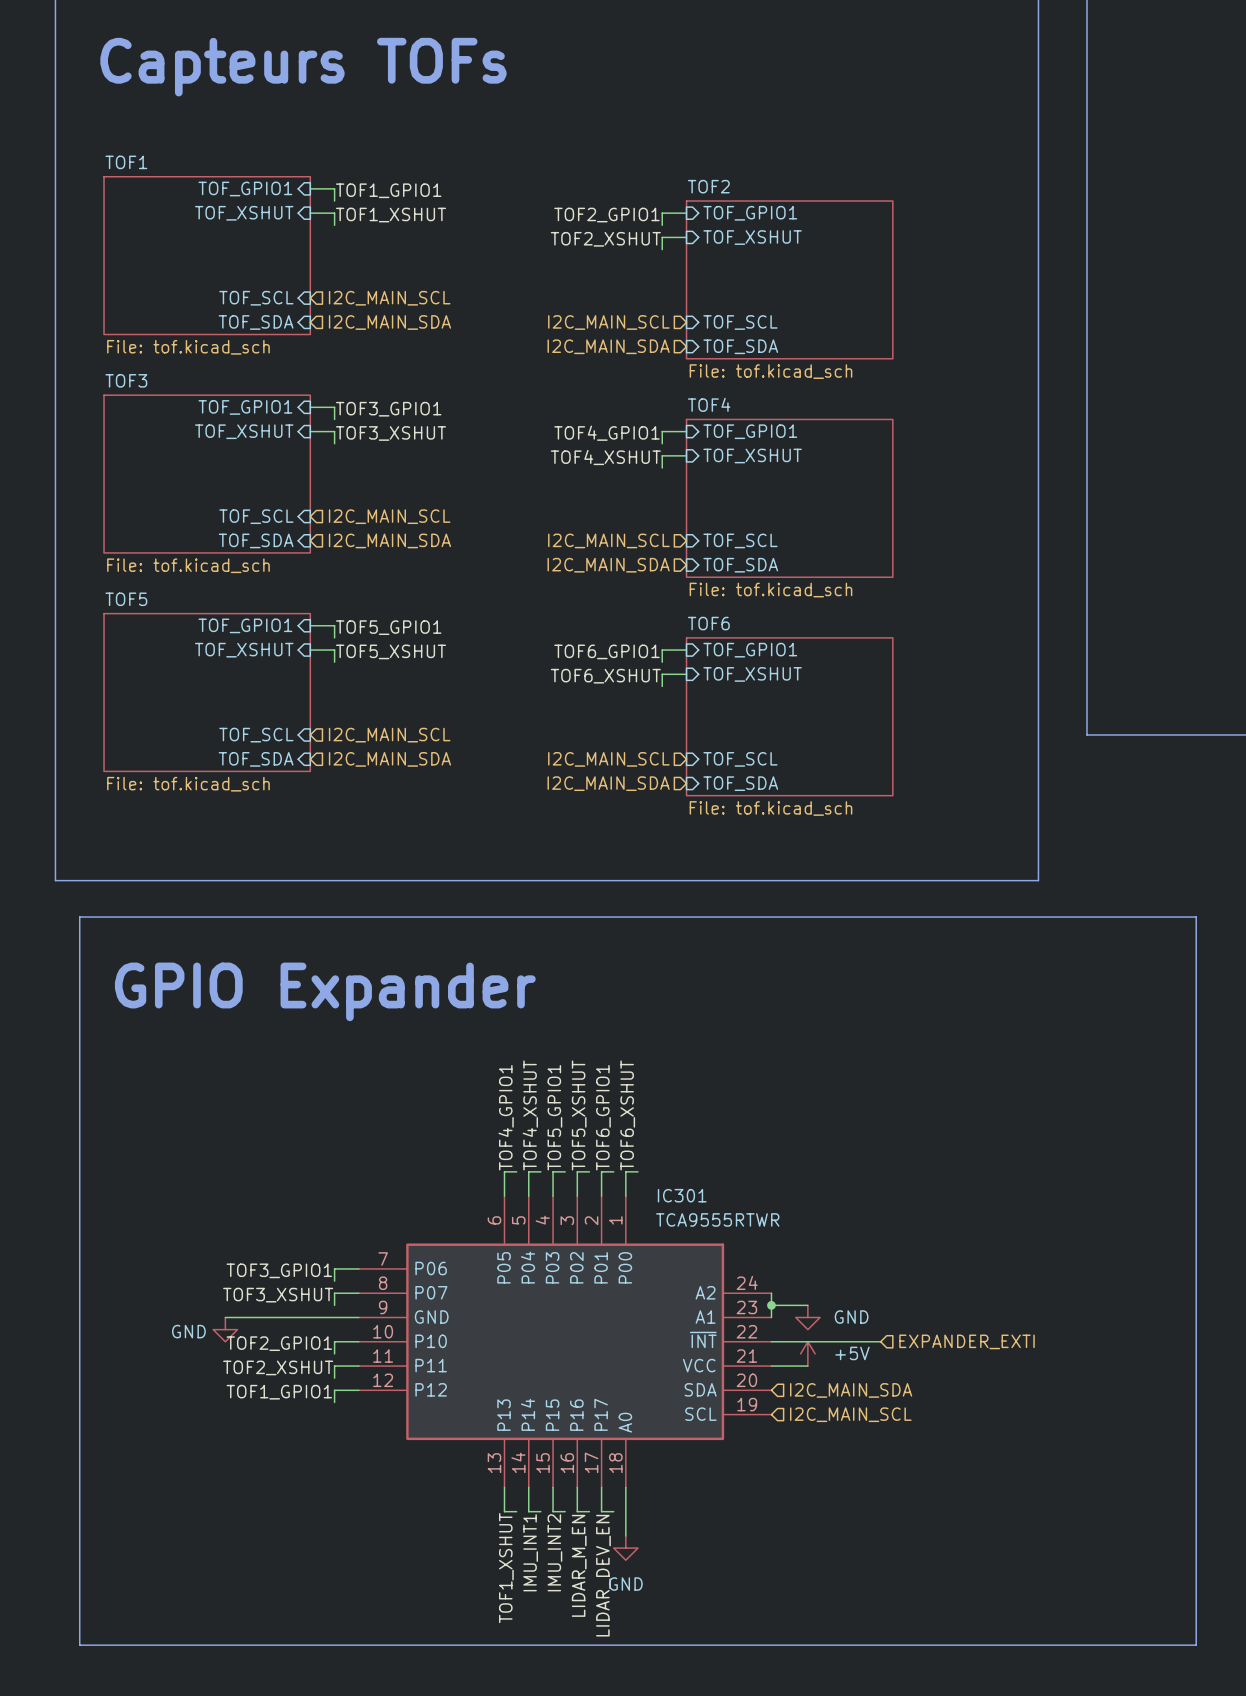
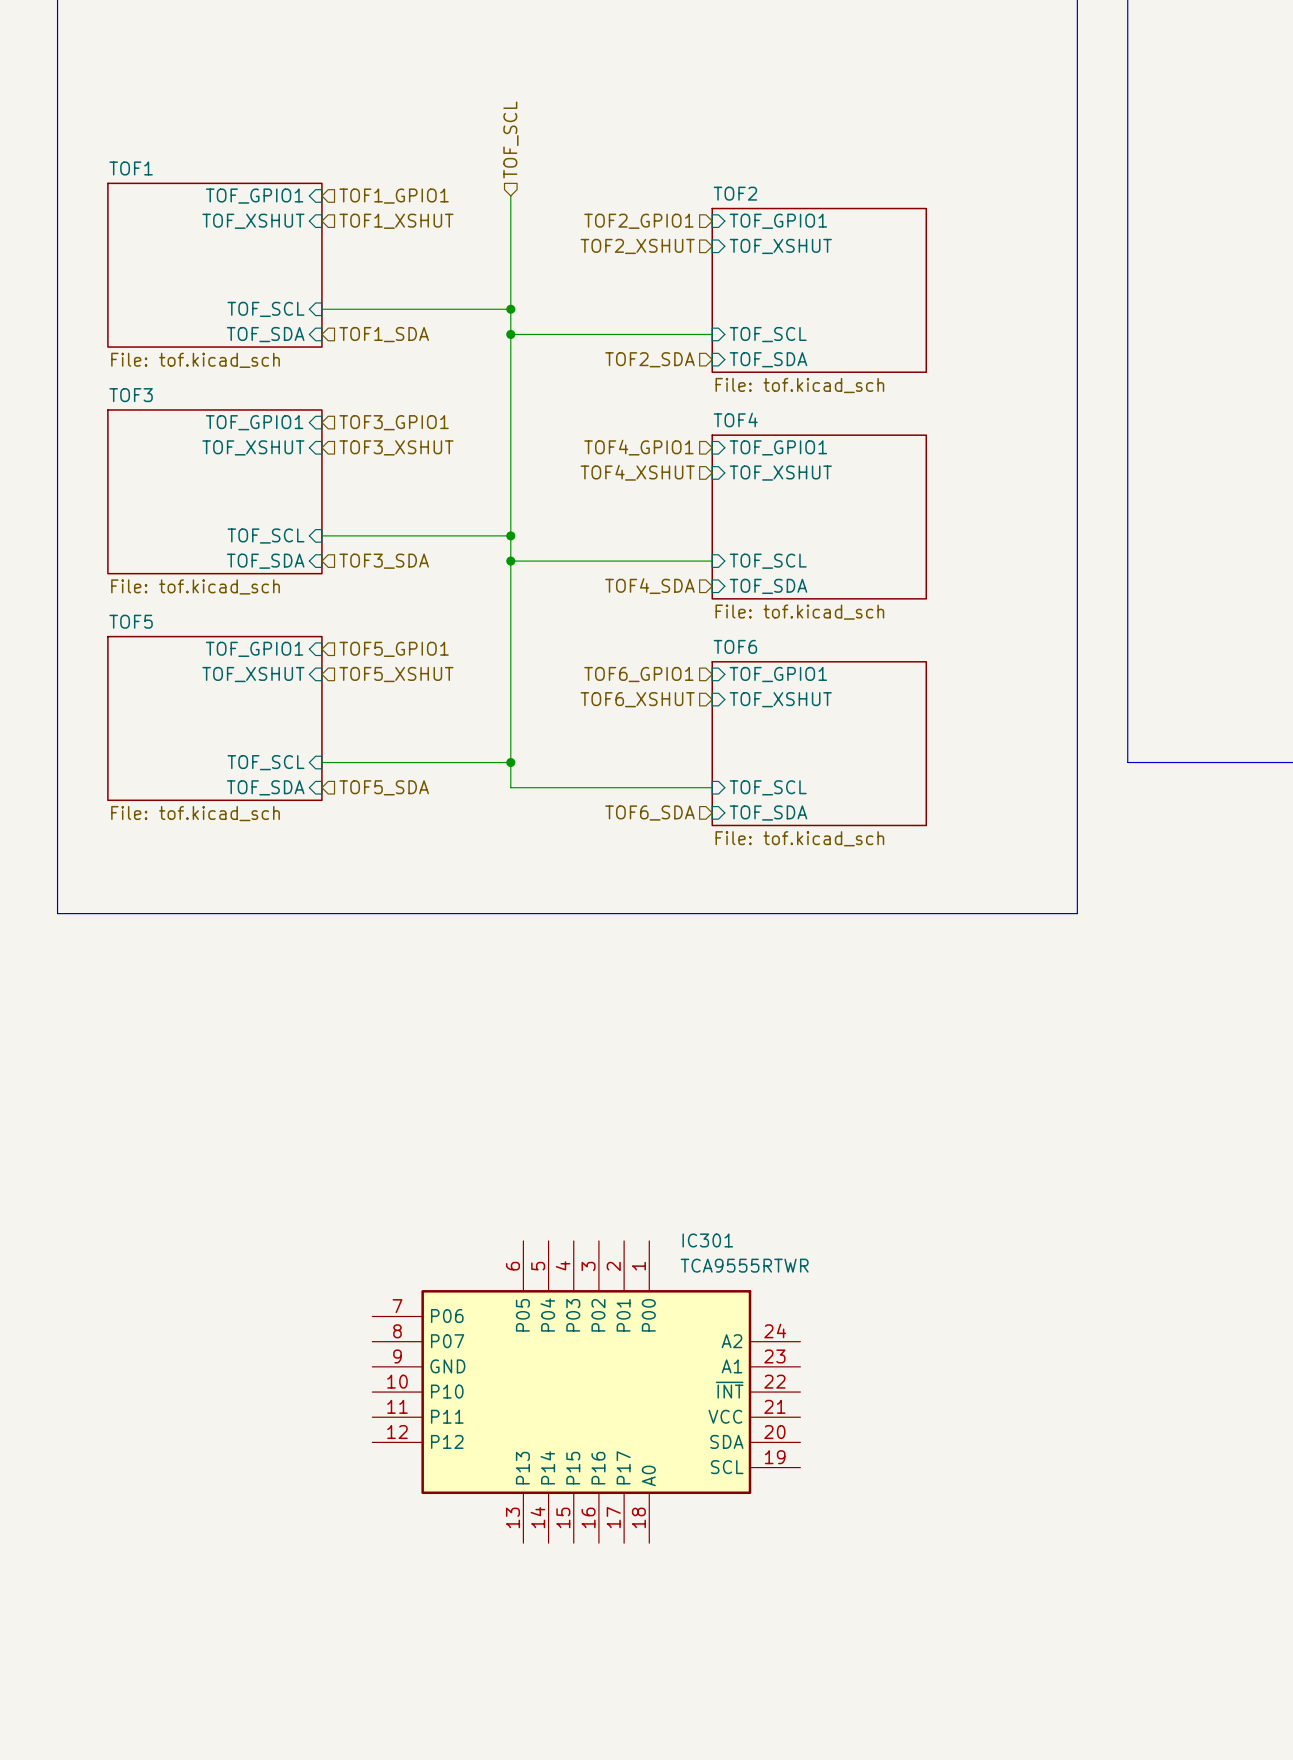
text: Capteurs TOFs (303, 67) -> none
hierarchical label: none -> TOF_SCL (510, 140)
wire: (310, 188) (334, 188) (334, 201) -> none
wire: none -> (510, 195) (510, 787) (712, 787)
hierarchical label: none -> TOF1_GPIO1 (394, 196)
label: TOF1_GPIO1 (388, 190) -> none
wire: (310, 213) (334, 213) (334, 225) -> none
hierarchical label: none -> TOF1_XSHUT (396, 221)
hierarchical label: none -> TOF2_GPIO1 (638, 221)
wire: (686, 213) (662, 213) (662, 225) -> none
label: TOF1_XSHUT (391, 215) -> none
label: TOF2_GPIO1 (606, 215) -> none
hierarchical label: none -> TOF2_XSHUT (637, 246)
wire: (686, 237) (662, 237) (662, 249) -> none
label: TOF2_XSHUT (605, 239) -> none
wire: none -> (321, 309) (510, 309)
hierarchical label: I2C_MAIN_SCL (389, 298) -> none
junction: none -> (510, 309)
hierarchical label: I2C_MAIN_SDA (389, 322) -> TOF1_SDA (384, 334)
wire: none -> (510, 334) (712, 334)
junction: none -> (510, 334)
hierarchical label: I2C_MAIN_SCL (608, 322) -> none
hierarchical label: I2C_MAIN_SDA (608, 346) -> TOF2_SDA (649, 359)
wire: (310, 407) (334, 407) (334, 419) -> none
hierarchical label: none -> TOF3_GPIO1 (394, 422)
label: TOF3_GPIO1 (388, 409) -> none
wire: (310, 431) (334, 431) (334, 443) -> none
hierarchical label: none -> TOF3_XSHUT (396, 447)
hierarchical label: none -> TOF4_GPIO1 (638, 447)
wire: (686, 431) (662, 431) (662, 443) -> none
label: TOF3_XSHUT (391, 433) -> none
label: TOF4_GPIO1 (606, 433) -> none
hierarchical label: none -> TOF4_XSHUT (637, 472)
wire: (686, 455) (662, 455) (662, 468) -> none
label: TOF4_XSHUT (605, 457) -> none
wire: none -> (321, 535) (510, 535)
hierarchical label: I2C_MAIN_SCL (389, 516) -> none
junction: none -> (510, 535)
hierarchical label: I2C_MAIN_SDA (389, 540) -> TOF3_SDA (384, 561)
wire: none -> (510, 561) (712, 561)
junction: none -> (510, 561)
hierarchical label: I2C_MAIN_SCL (608, 540) -> none
hierarchical label: I2C_MAIN_SDA (608, 565) -> TOF4_SDA (649, 586)
wire: (310, 625) (334, 625) (334, 637) -> none
hierarchical label: none -> TOF5_GPIO1 (394, 649)
label: TOF5_GPIO1 (388, 627) -> none
wire: (310, 650) (334, 650) (334, 662) -> none
hierarchical label: none -> TOF5_XSHUT (396, 674)
hierarchical label: none -> TOF6_GPIO1 (638, 674)
wire: (686, 650) (662, 650) (662, 662) -> none
label: TOF5_XSHUT (391, 651) -> none
label: TOF6_GPIO1 (606, 651) -> none
hierarchical label: none -> TOF6_XSHUT (637, 699)
wire: (686, 674) (662, 674) (662, 686) -> none
label: TOF6_XSHUT (605, 676) -> none
wire: none -> (321, 762) (510, 762)
junction: none -> (510, 762)
hierarchical label: I2C_MAIN_SCL (389, 735) -> none
hierarchical label: I2C_MAIN_SDA (389, 759) -> TOF5_SDA (384, 787)
hierarchical label: I2C_MAIN_SCL (608, 759) -> none
hierarchical label: I2C_MAIN_SDA (608, 783) -> TOF6_SDA (649, 813)
line: (79, 917) (1196, 917) (1196, 1645) (79, 1645) (79, 917) -> none
text: GPIO Expander (325, 991) -> none
label: TOF4_XSHUT (530, 1115) -> none
label: TOF5_XSHUT (579, 1115) -> none
label: TOF6_XSHUT (627, 1115) -> none
label: TOF4_GPIO1 (506, 1117) -> none
label: TOF5_GPIO1 (554, 1117) -> none
label: TOF6_GPIO1 (603, 1117) -> none
wire: (516, 1171) (504, 1171) (504, 1196) -> none
wire: (540, 1171) (528, 1171) (528, 1196) -> none
wire: (565, 1171) (553, 1171) (553, 1196) -> none
wire: (589, 1171) (577, 1171) (577, 1196) -> none
wire: (613, 1171) (601, 1171) (601, 1196) -> none
wire: (637, 1171) (625, 1171) (625, 1196) -> none
wire: (358, 1268) (334, 1268) (334, 1281) -> none
label: TOF3_GPIO1 (279, 1270) -> none
wire: (358, 1293) (334, 1293) (334, 1305) -> none
wire: (771, 1293) (771, 1317) -> none
label: TOF3_XSHUT (278, 1295) -> none
wire: (771, 1305) (807, 1305) -> none
junction: (771, 1305) -> none
wire: (225, 1317) (358, 1317) -> none
power symbol: GND (807, 1317) -> none
power symbol: GND (225, 1329) -> none
wire: (358, 1341) (334, 1341) (334, 1353) -> none
wire: (771, 1341) (880, 1341) -> none
hierarchical label: EXPANDER_EXTI (966, 1341) -> none
label: TOF2_GPIO1 (279, 1343) -> none
power symbol: +5V (807, 1353) -> none
wire: (358, 1366) (334, 1366) (334, 1378) -> none
wire: (771, 1366) (807, 1366) -> none
label: TOF2_XSHUT (278, 1367) -> none
wire: (358, 1390) (334, 1390) (334, 1402) -> none
hierarchical label: I2C_MAIN_SDA (851, 1390) -> none
label: TOF1_GPIO1 (279, 1392) -> none
hierarchical label: I2C_MAIN_SCL (850, 1414) -> none
wire: (504, 1487) (504, 1511) (516, 1511) -> none
wire: (528, 1487) (528, 1511) (540, 1511) -> none
wire: (553, 1487) (553, 1511) (565, 1511) -> none
wire: (577, 1487) (577, 1511) (589, 1511) -> none
wire: (601, 1487) (601, 1511) (613, 1511) -> none
wire: (625, 1487) (625, 1535) -> none
power symbol: GND (625, 1548) -> none
label: IMU_INT1 (530, 1552) -> none
label: IMU_INT2 (554, 1552) -> none
label: LIDAR_M_EN (579, 1565) -> none
label: TOF1_XSHUT (506, 1568) -> none
label: LIDAR_DEV_EN (603, 1575) -> none

